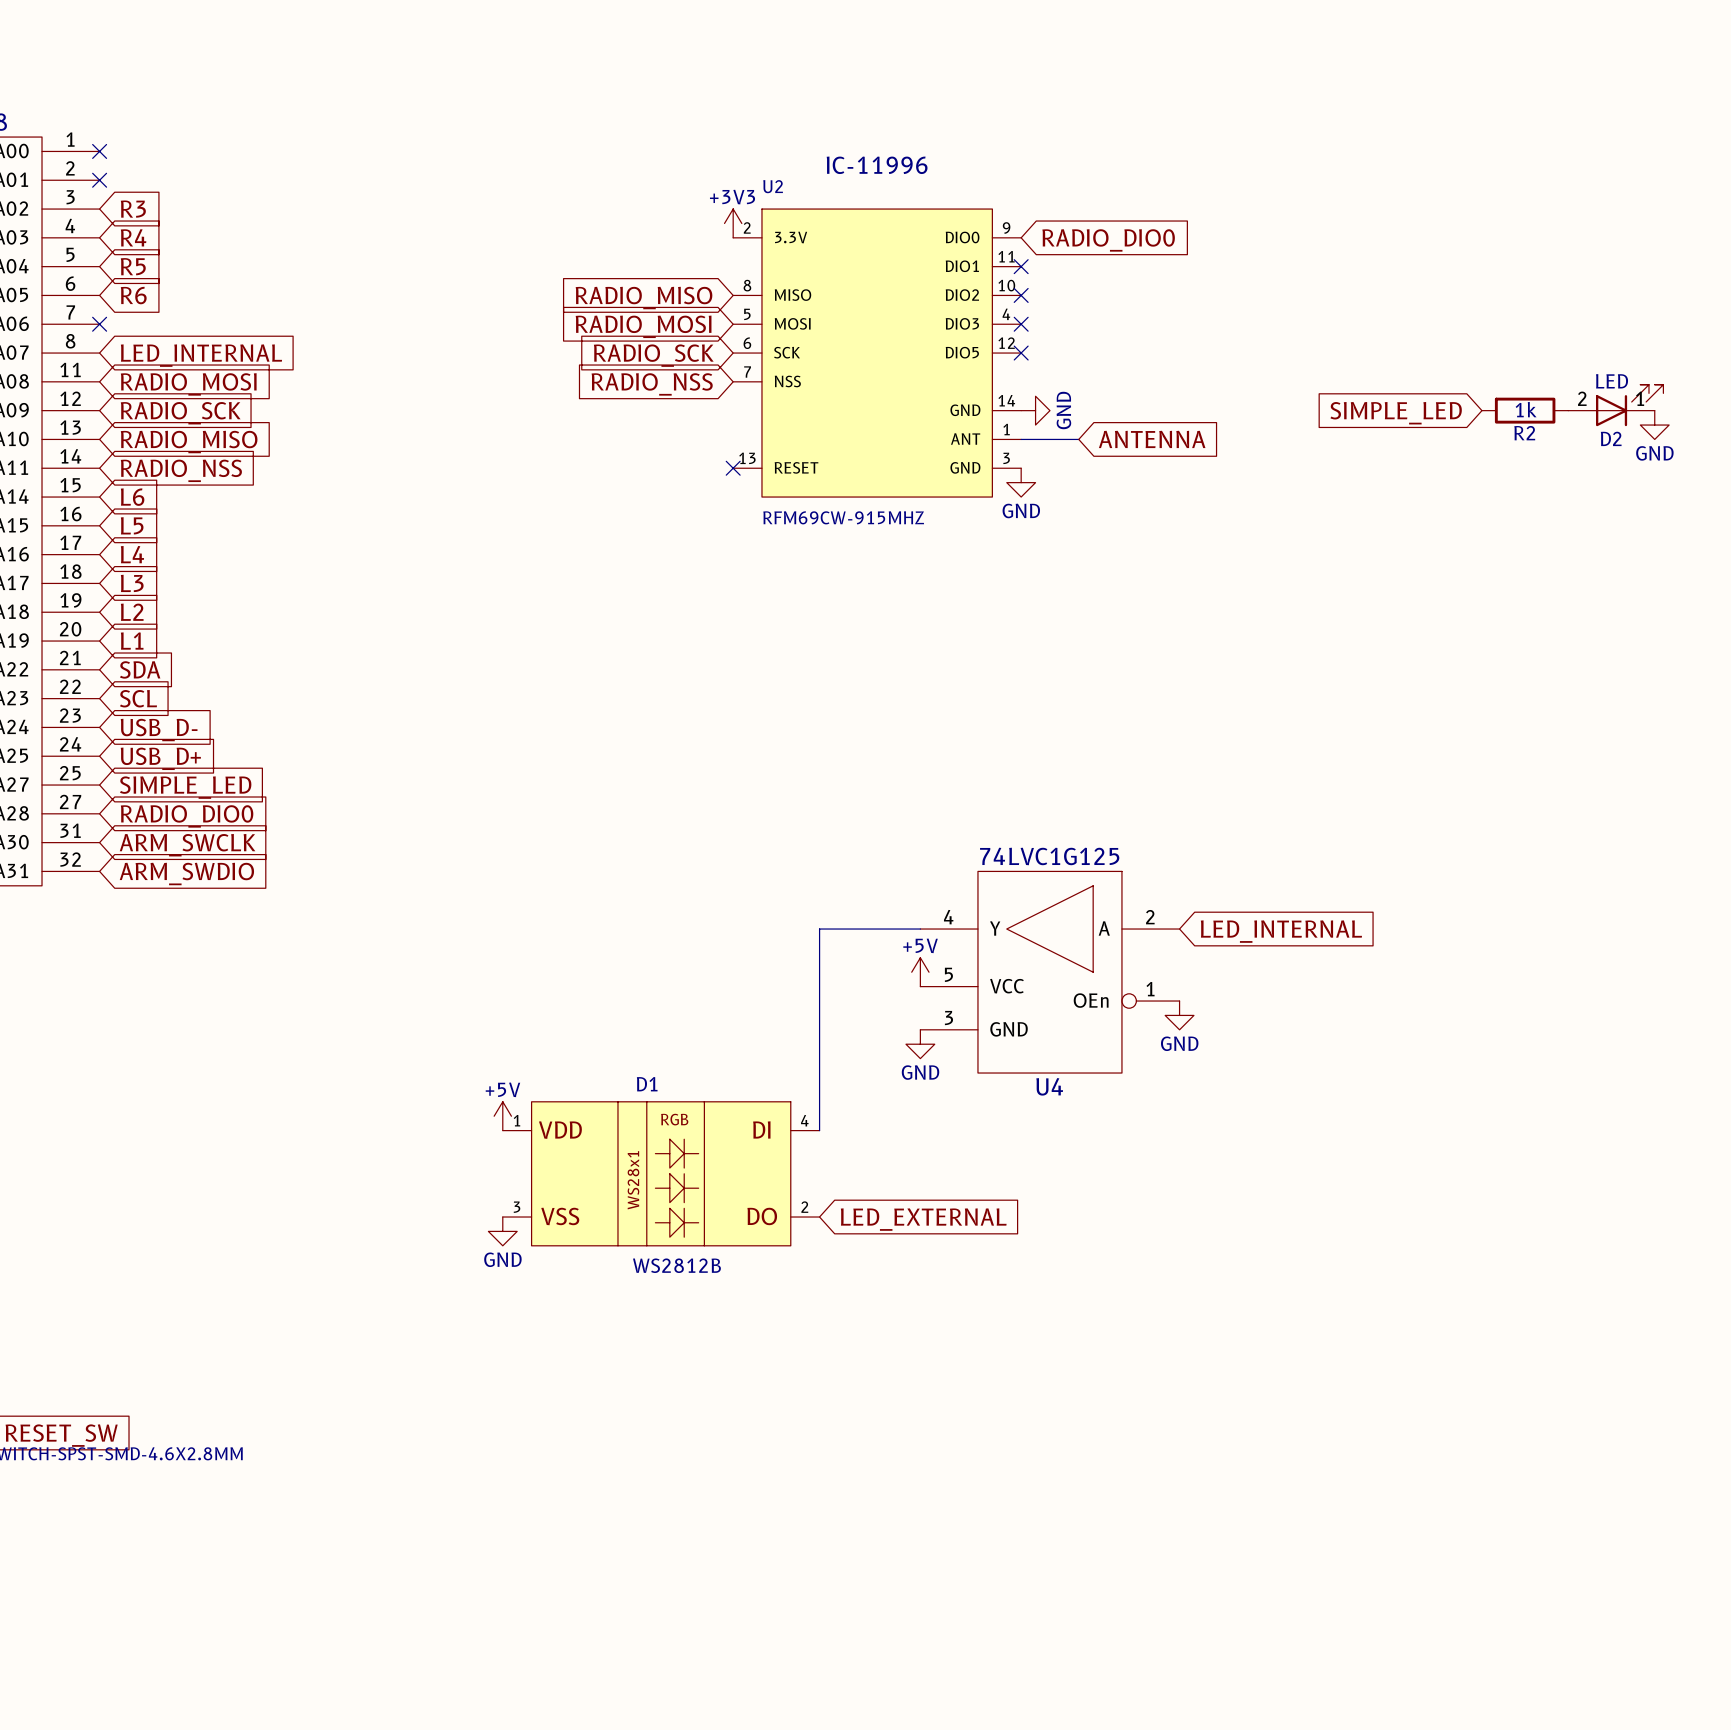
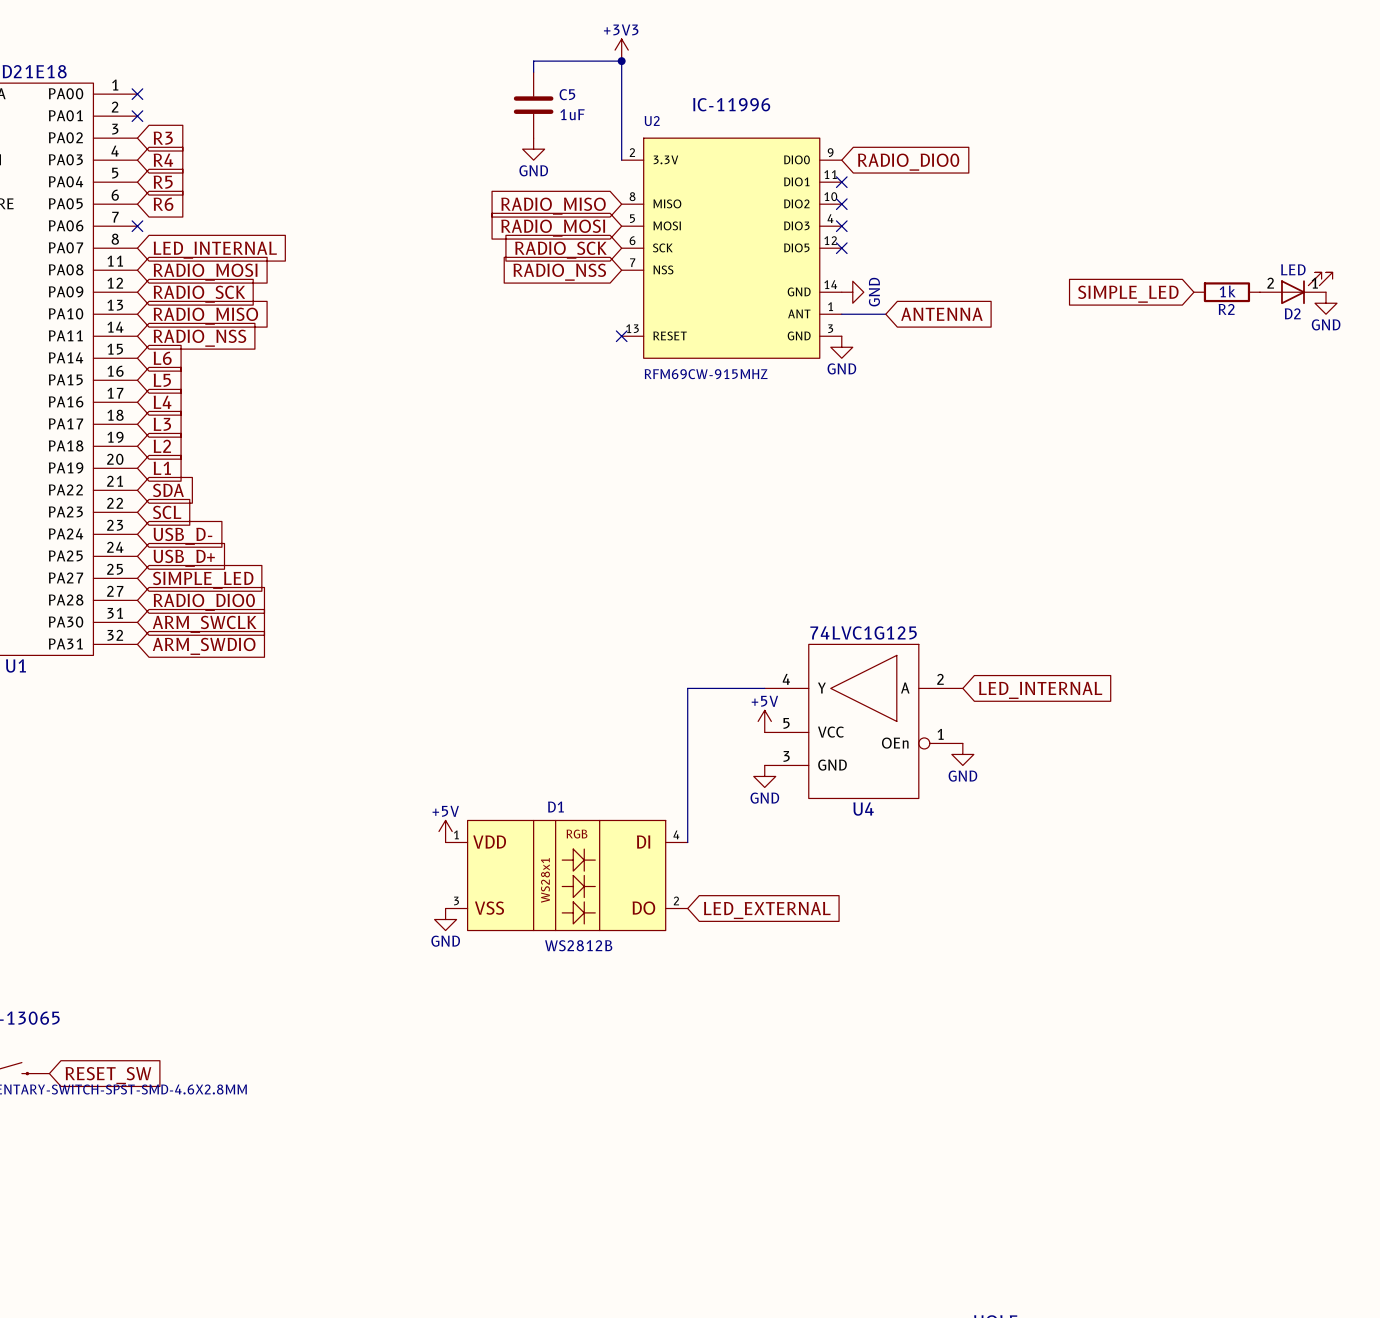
junction: none -> (621, 61)
wire: none -> (533, 72) (533, 61) (621, 61) (621, 160)
C5: none -> 1uF (533, 105)
power symbol: none -> GND (533, 149)
power symbol position: +3V3 (733, 223) -> +3V3 (621, 50)

